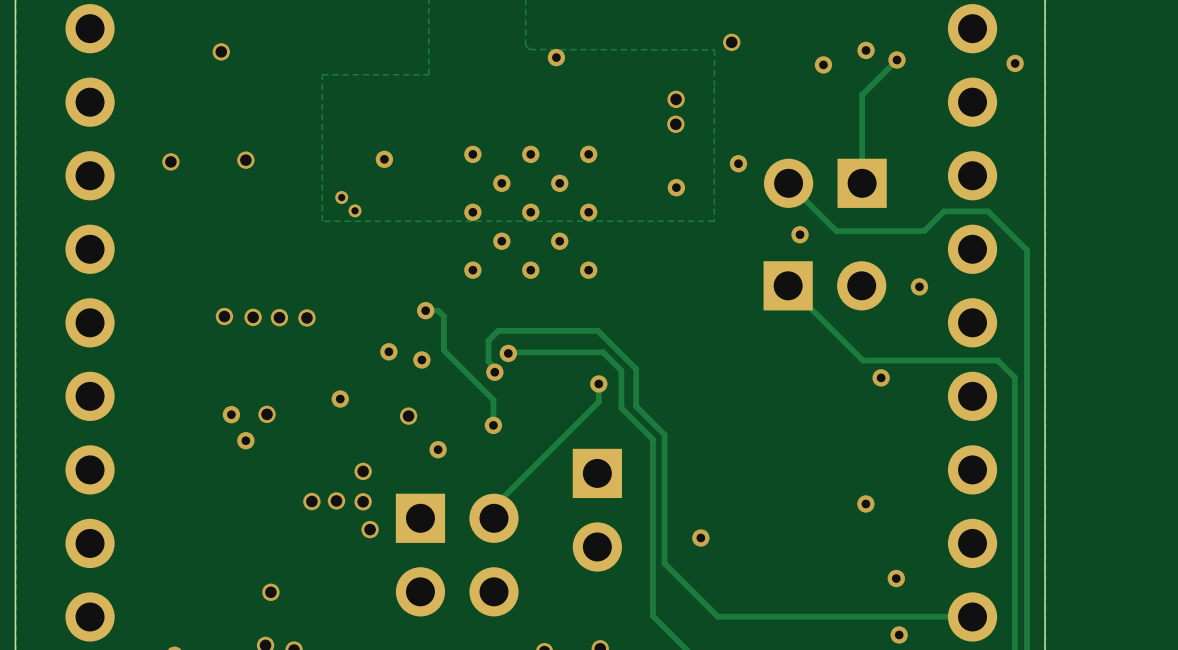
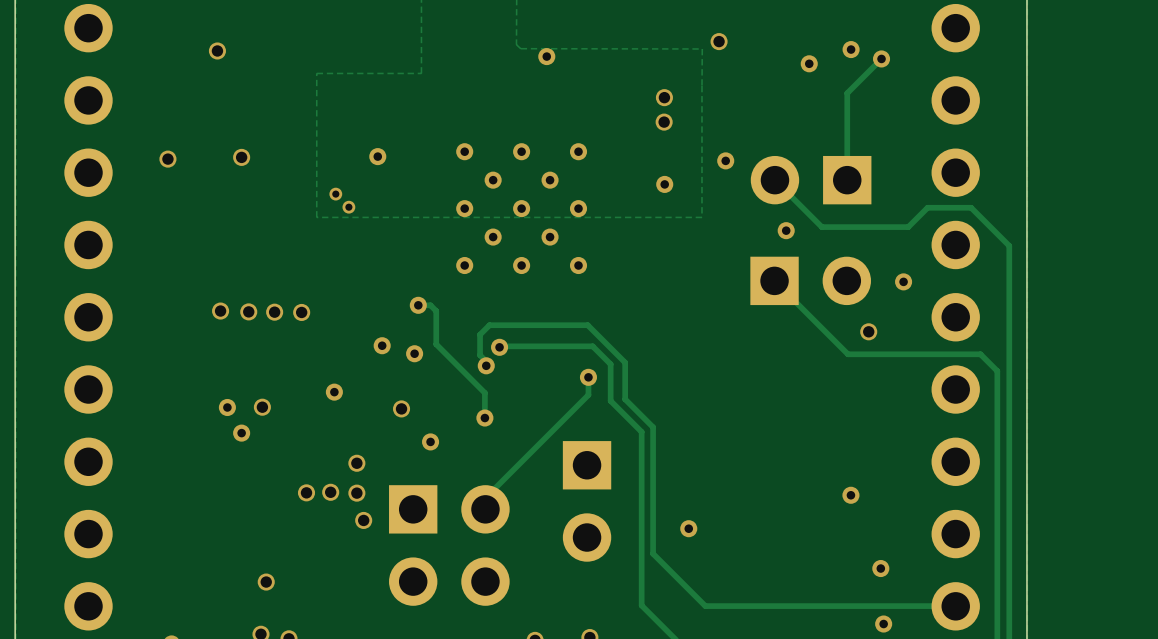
via: (1015, 63) -> none
via: none -> (868, 331)
via: (881, 377) -> none

